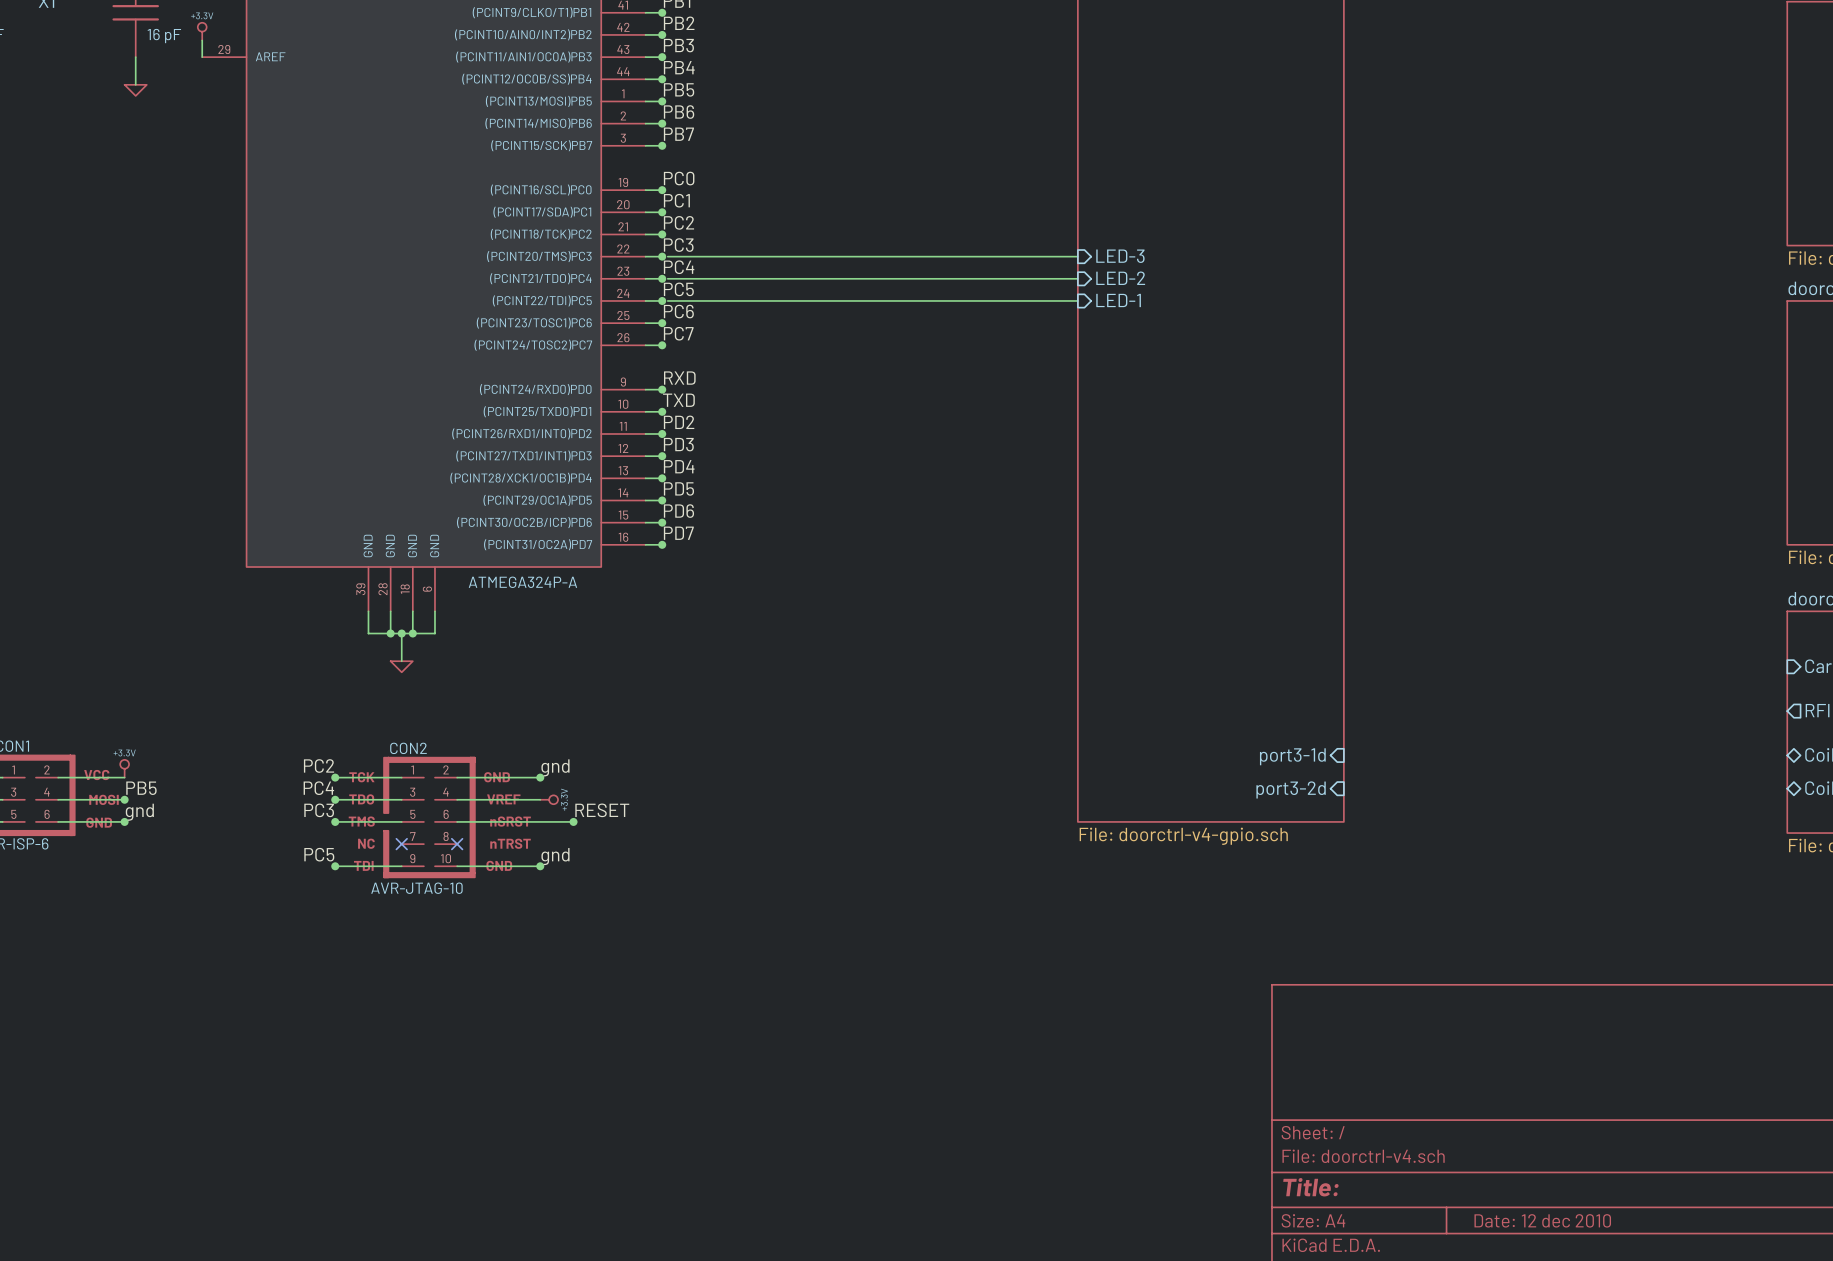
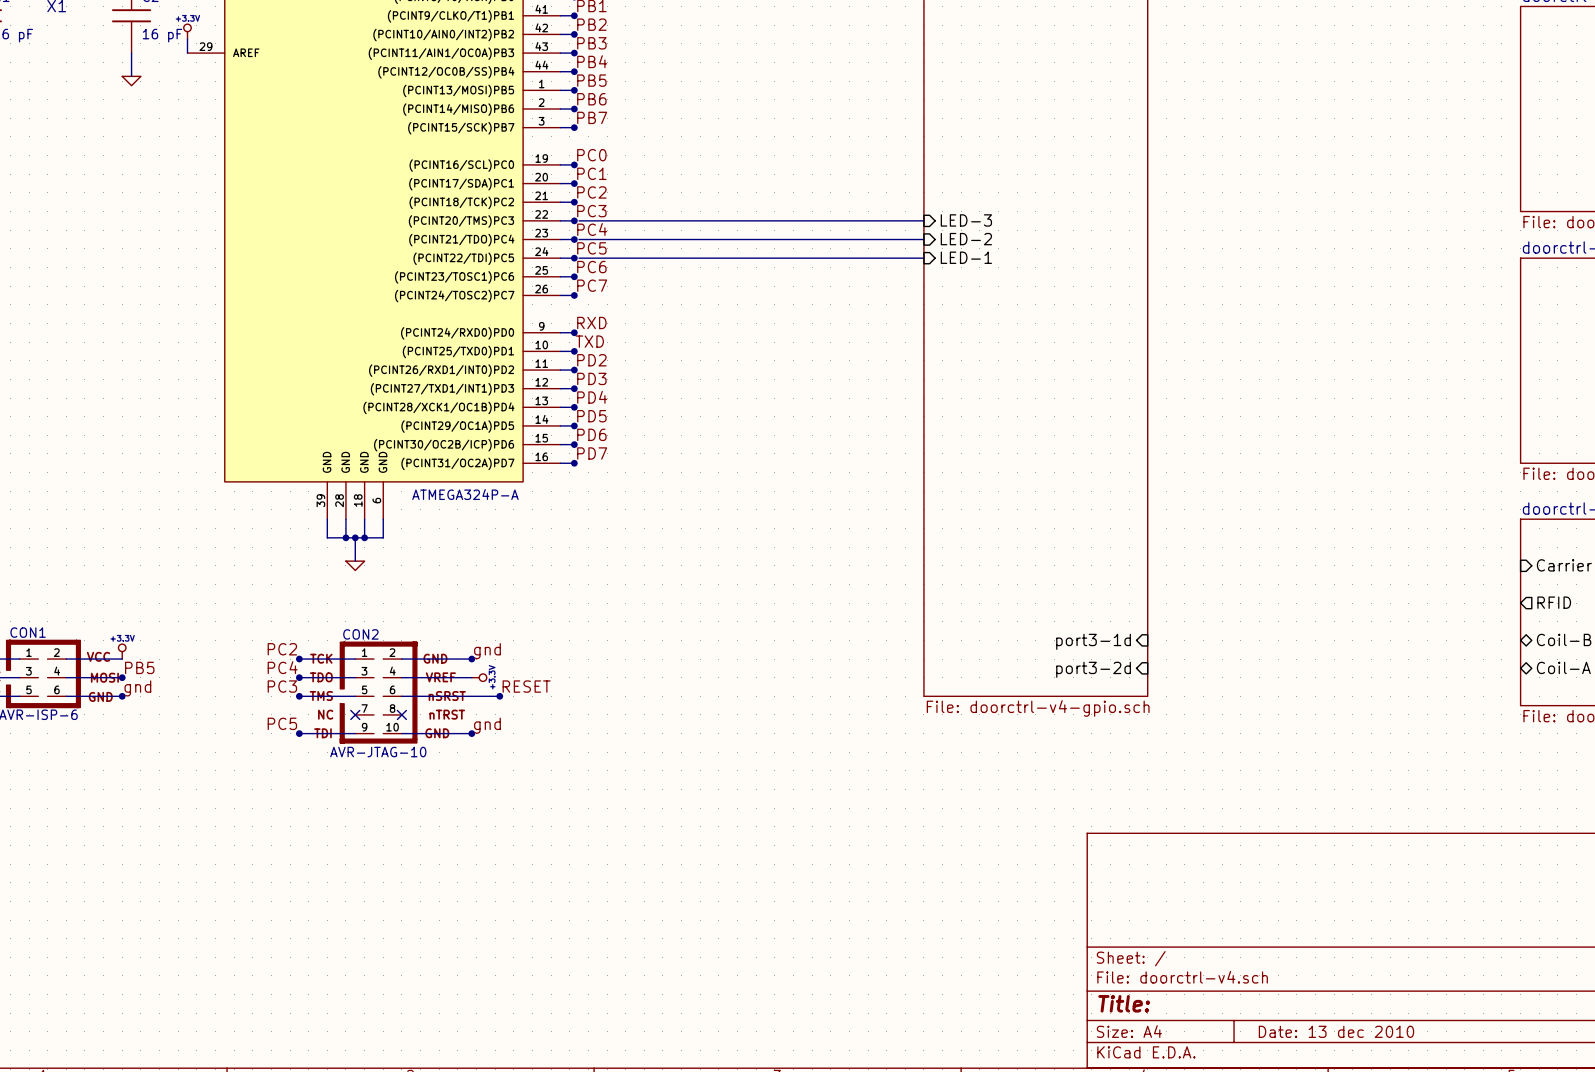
title block: Date: 12 dec 2010 (1542, 1220) -> Date: 13 dec 2010 (1336, 1031)

